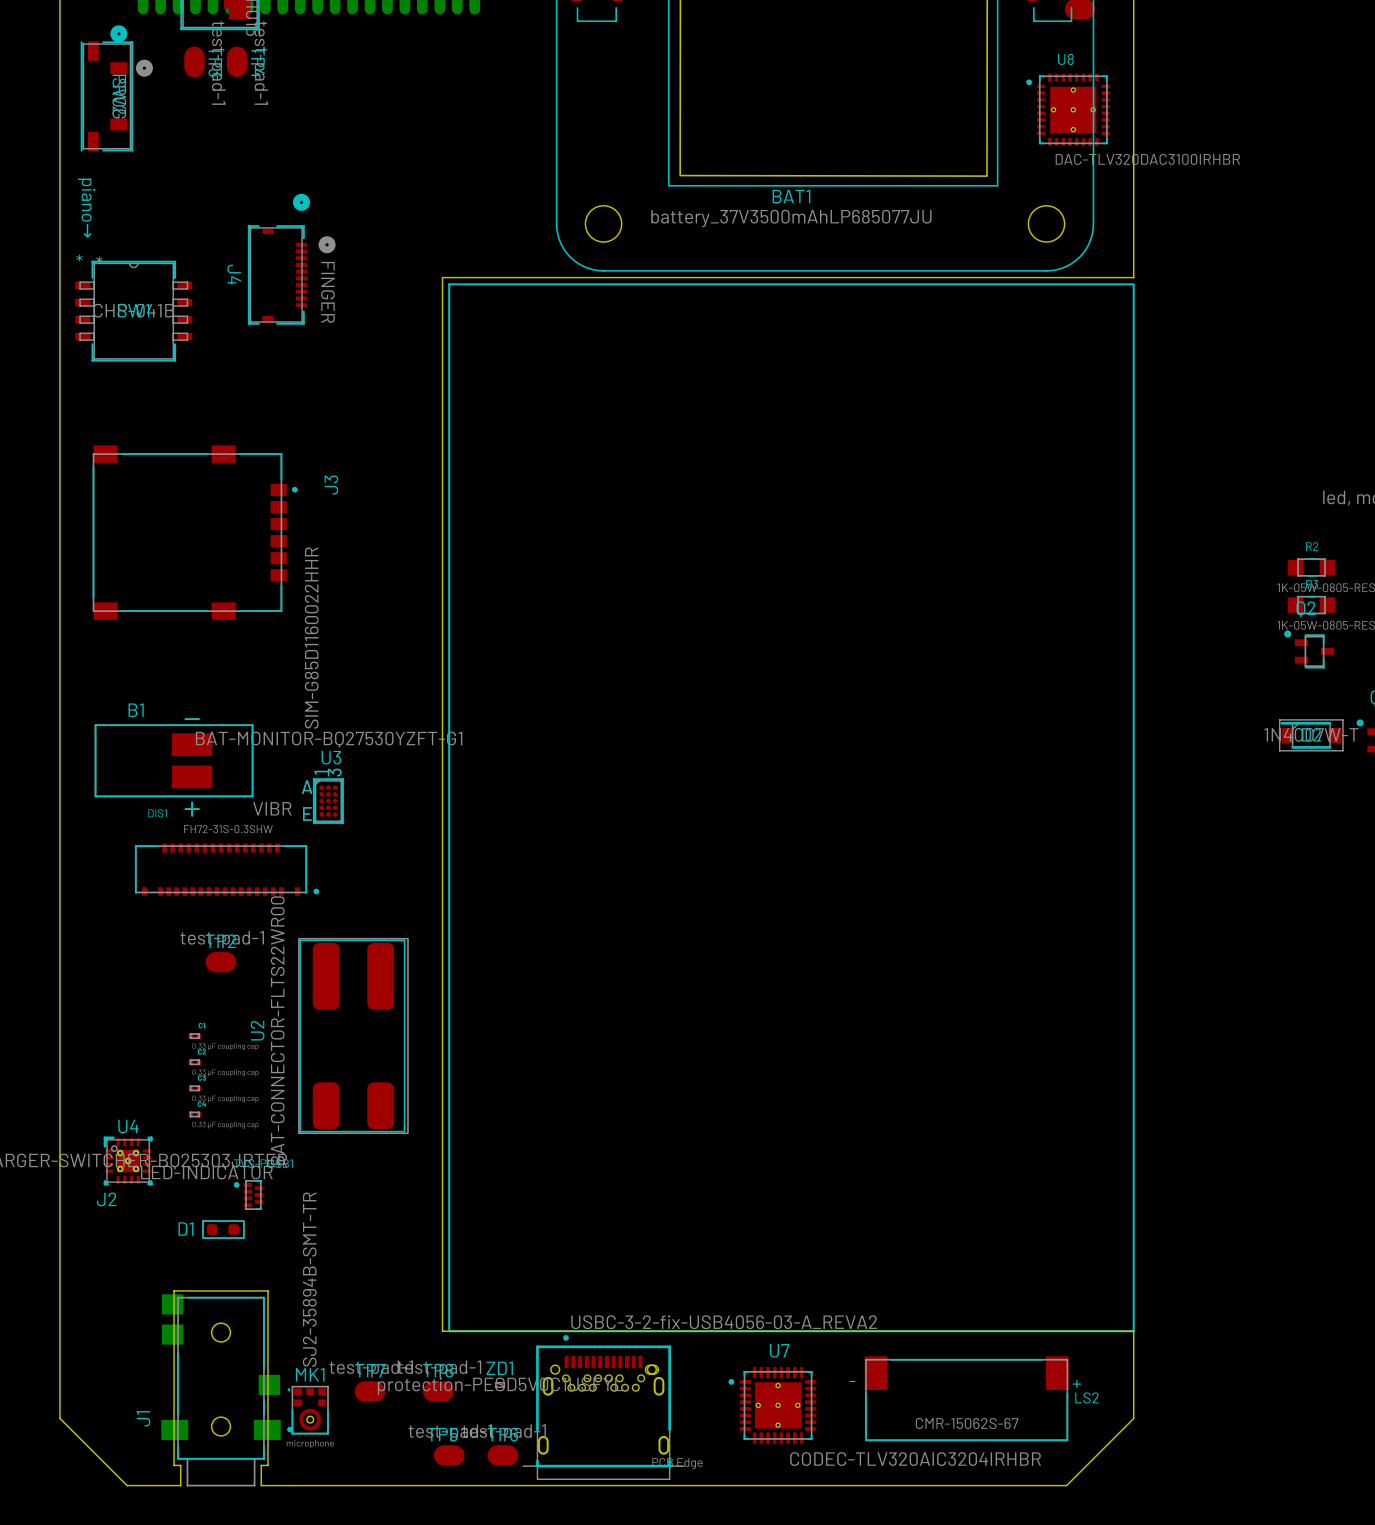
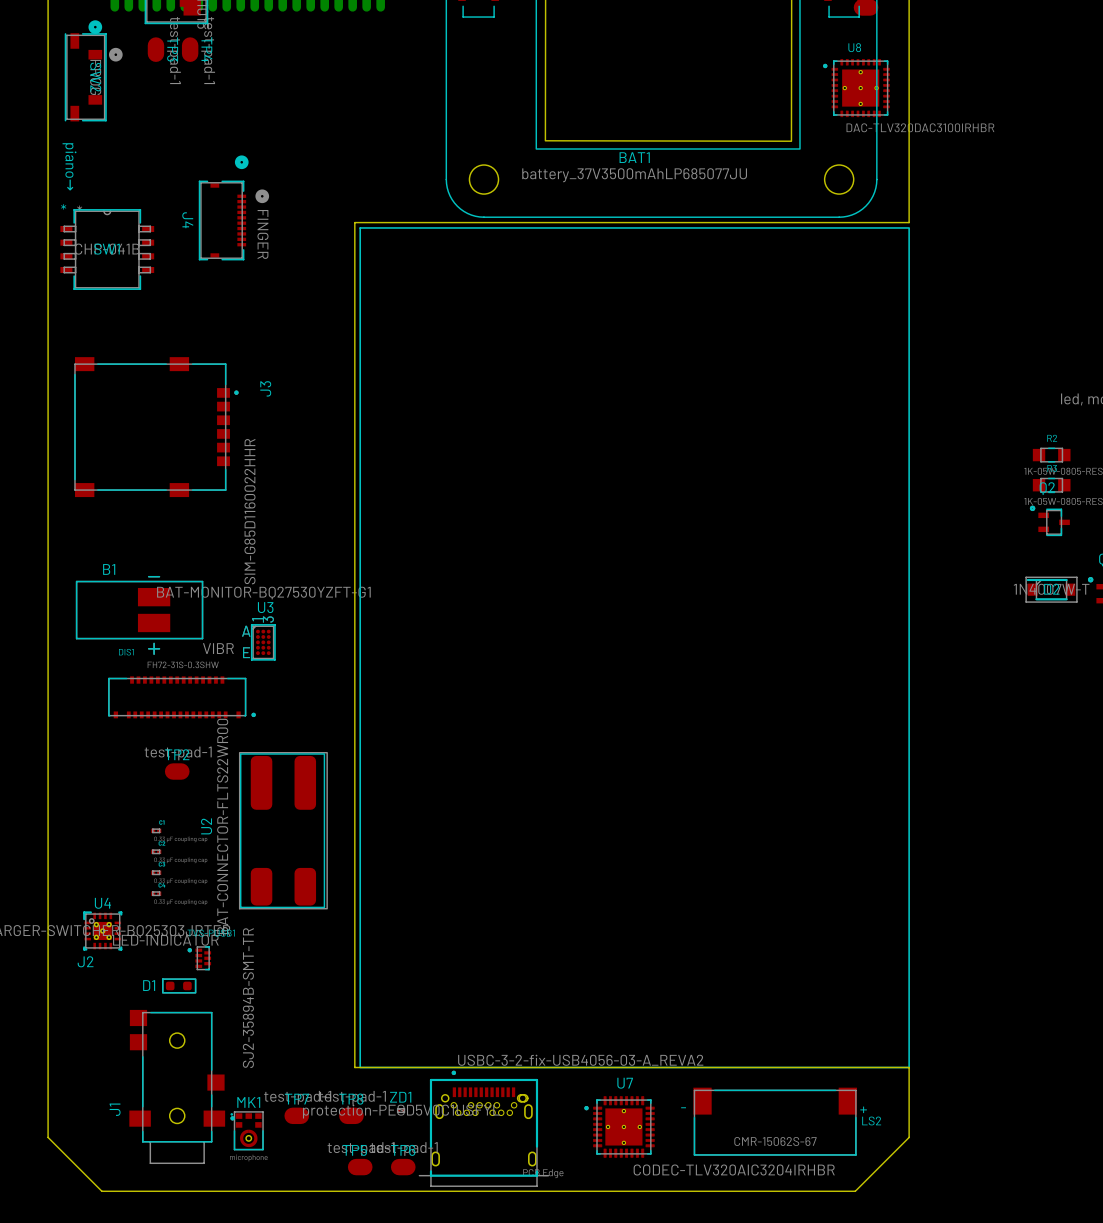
J1 footprint: [161, 1294, 293, 1487] -> [129, 1009, 235, 1164]
board edge: (180, 1485) (180, 1465) (174, 1465) (174, 1290) (268, 1290) (268, 1465) (261, 1465) (261, 1485) -> (144, 1191) (209, 1191)

